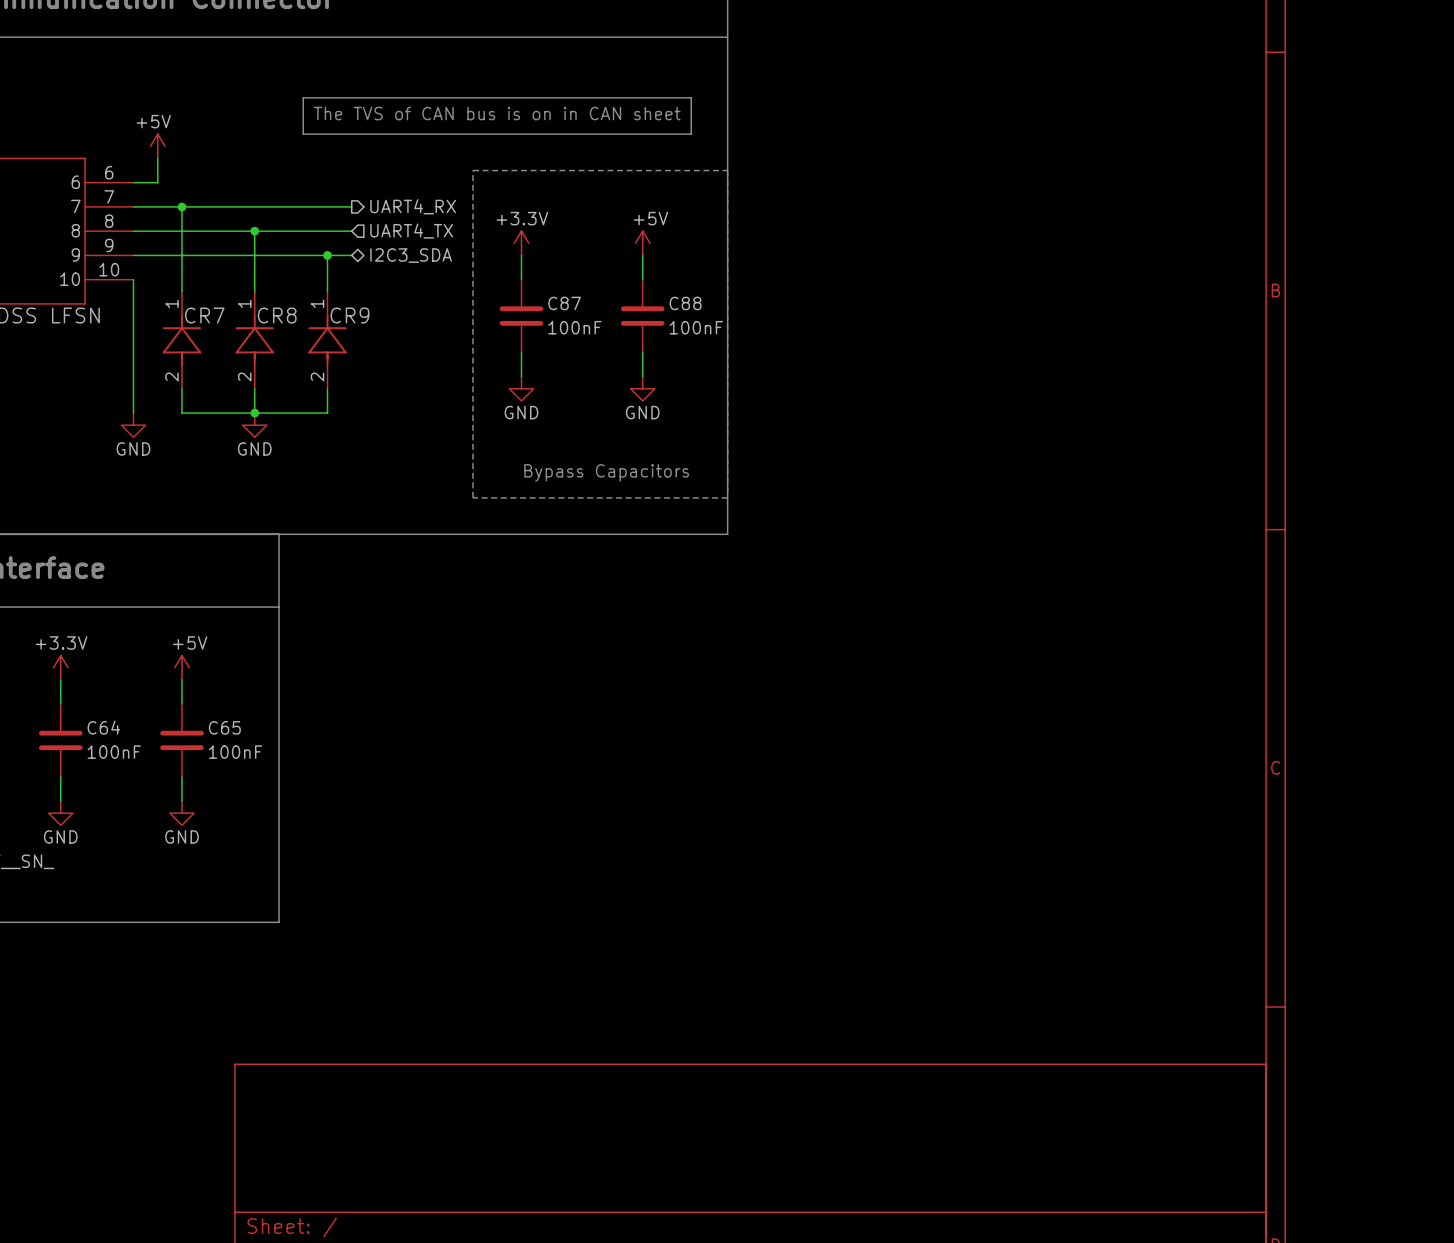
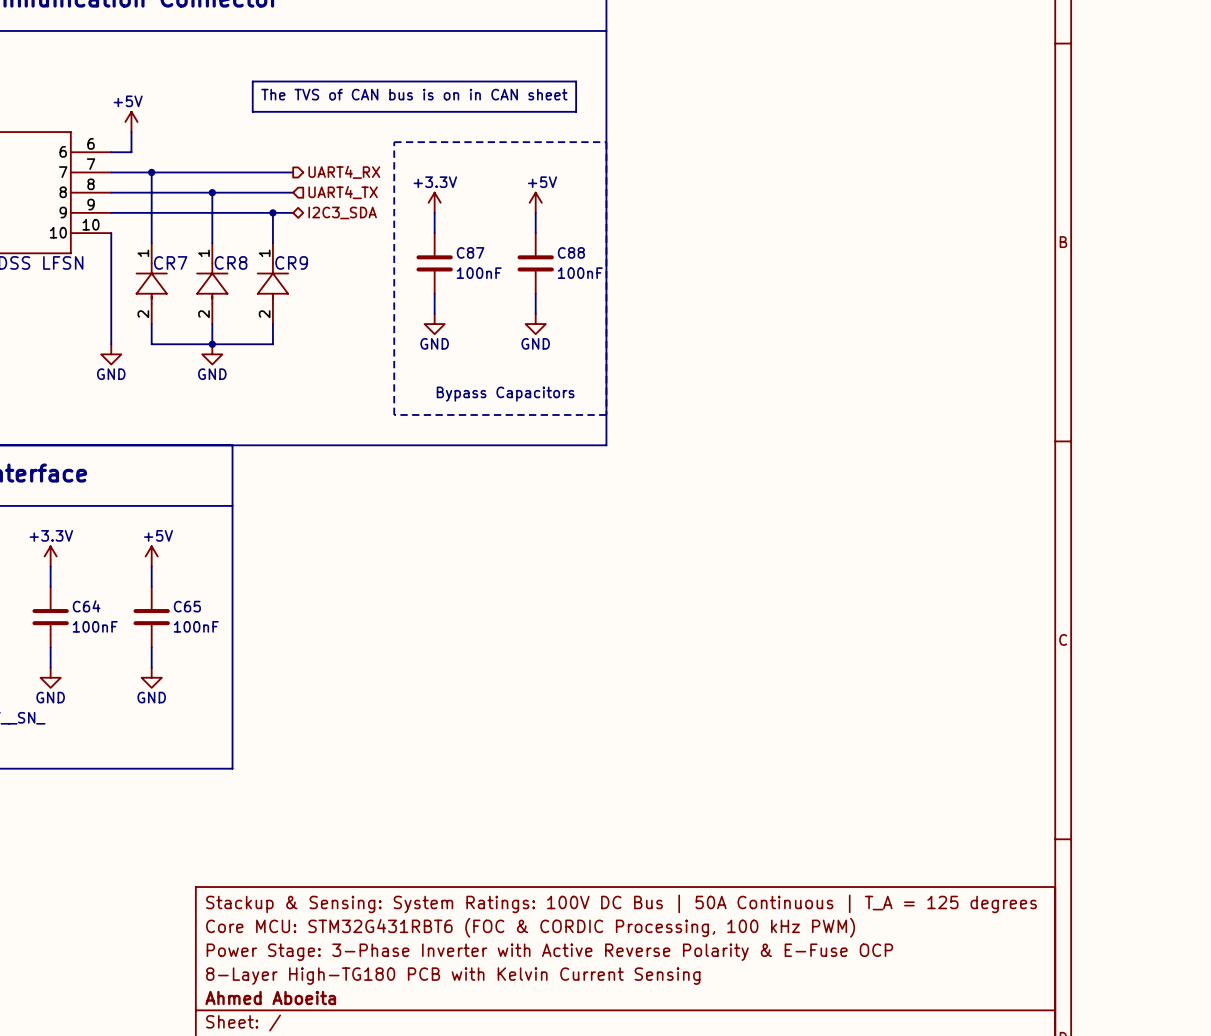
title block: none -> Stackup & Sensing: System Ratings: 100V DC Bus | 50A Continuous | T_A = 125 degrees (621, 903)
title block: none -> Core MCU: STM32G431RBT6 (FOC & CORDIC Processing, 100 kHz PWM) (530, 927)
title block: none -> Power Stage: 3-Phase Inverter with Active Reverse Polarity & E-Fuse OCP (549, 952)
title block: none -> 8-Layer High-TG180 PCB with Kelvin Current Sensing (453, 976)
title block: none -> Ahmed Aboeita (270, 997)

